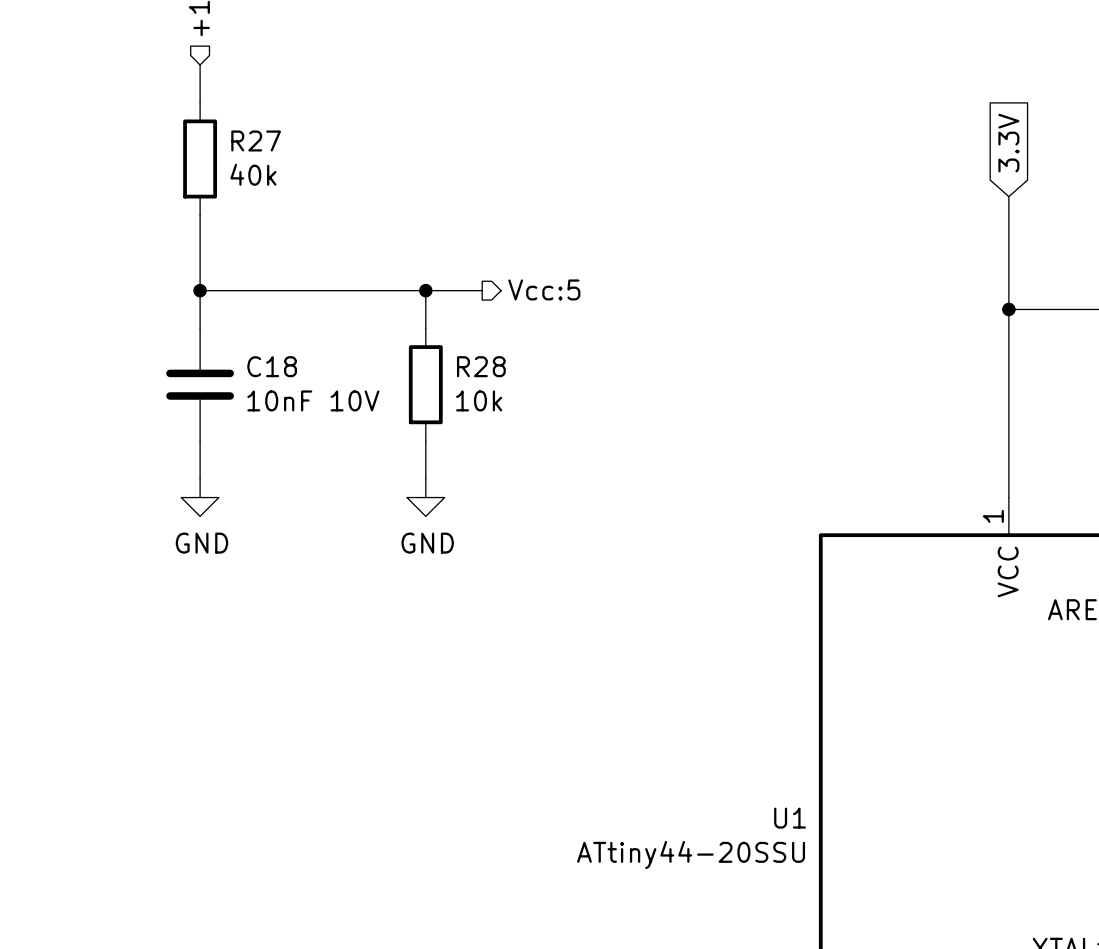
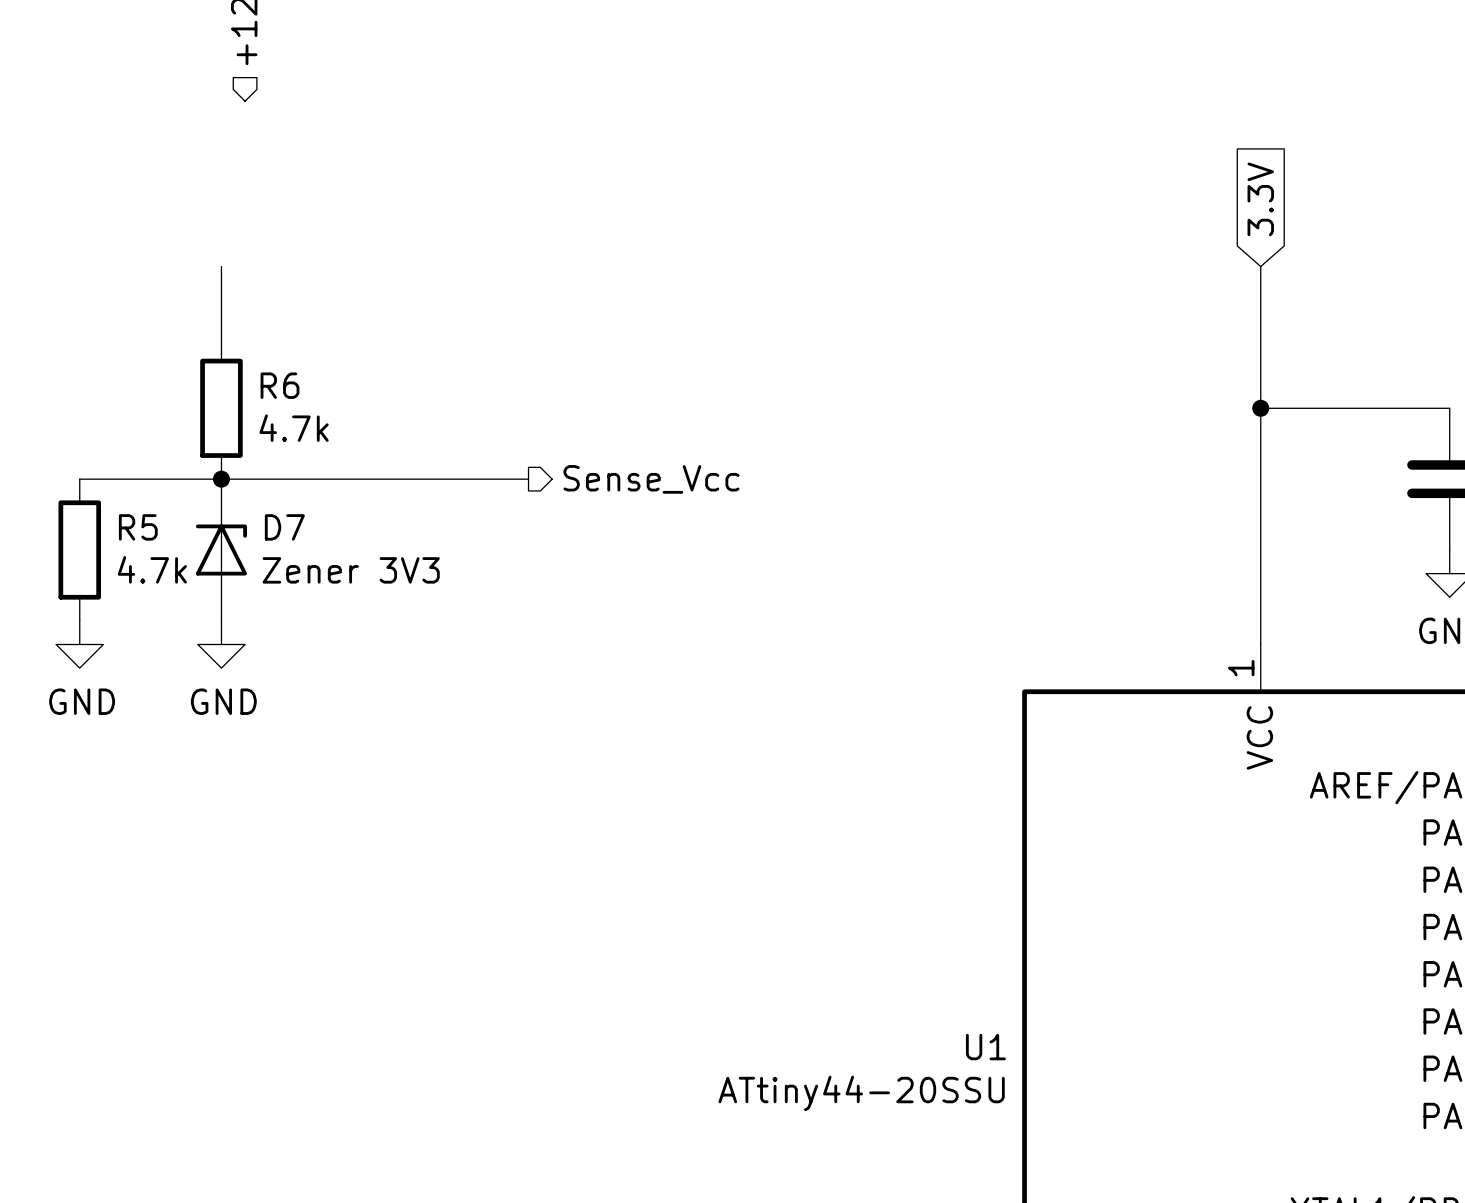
wire: (200, 64) (200, 102) -> none
R27: 40k (200, 158) -> none
wire: none -> (221, 266) (221, 337)
wire: (200, 215) (200, 328) -> none
hierarchical label: Vcc:5 (544, 289) -> none
wire: (200, 290) (482, 290) -> none
junction position: (200, 290) -> (221, 479)
wire: (425, 290) (425, 328) -> none
junction: (425, 290) -> none
R6: none -> 4.7k (221, 408)
wire: none -> (79, 479) (528, 479)
hierarchical label: none -> Sense_Vcc (651, 479)
C18: 10nF 10V (200, 384) -> none
R28: 10k (425, 384) -> none
R5: none -> 4.7k (79, 550)
D7: none -> Zener 3V3 (221, 550)
wire: (200, 441) (200, 478) -> none
wire: (425, 441) (425, 478) -> none
power symbol: none -> GND (79, 644)
power symbol position: GND (200, 497) -> GND (221, 644)
power symbol: GND (425, 497) -> none

